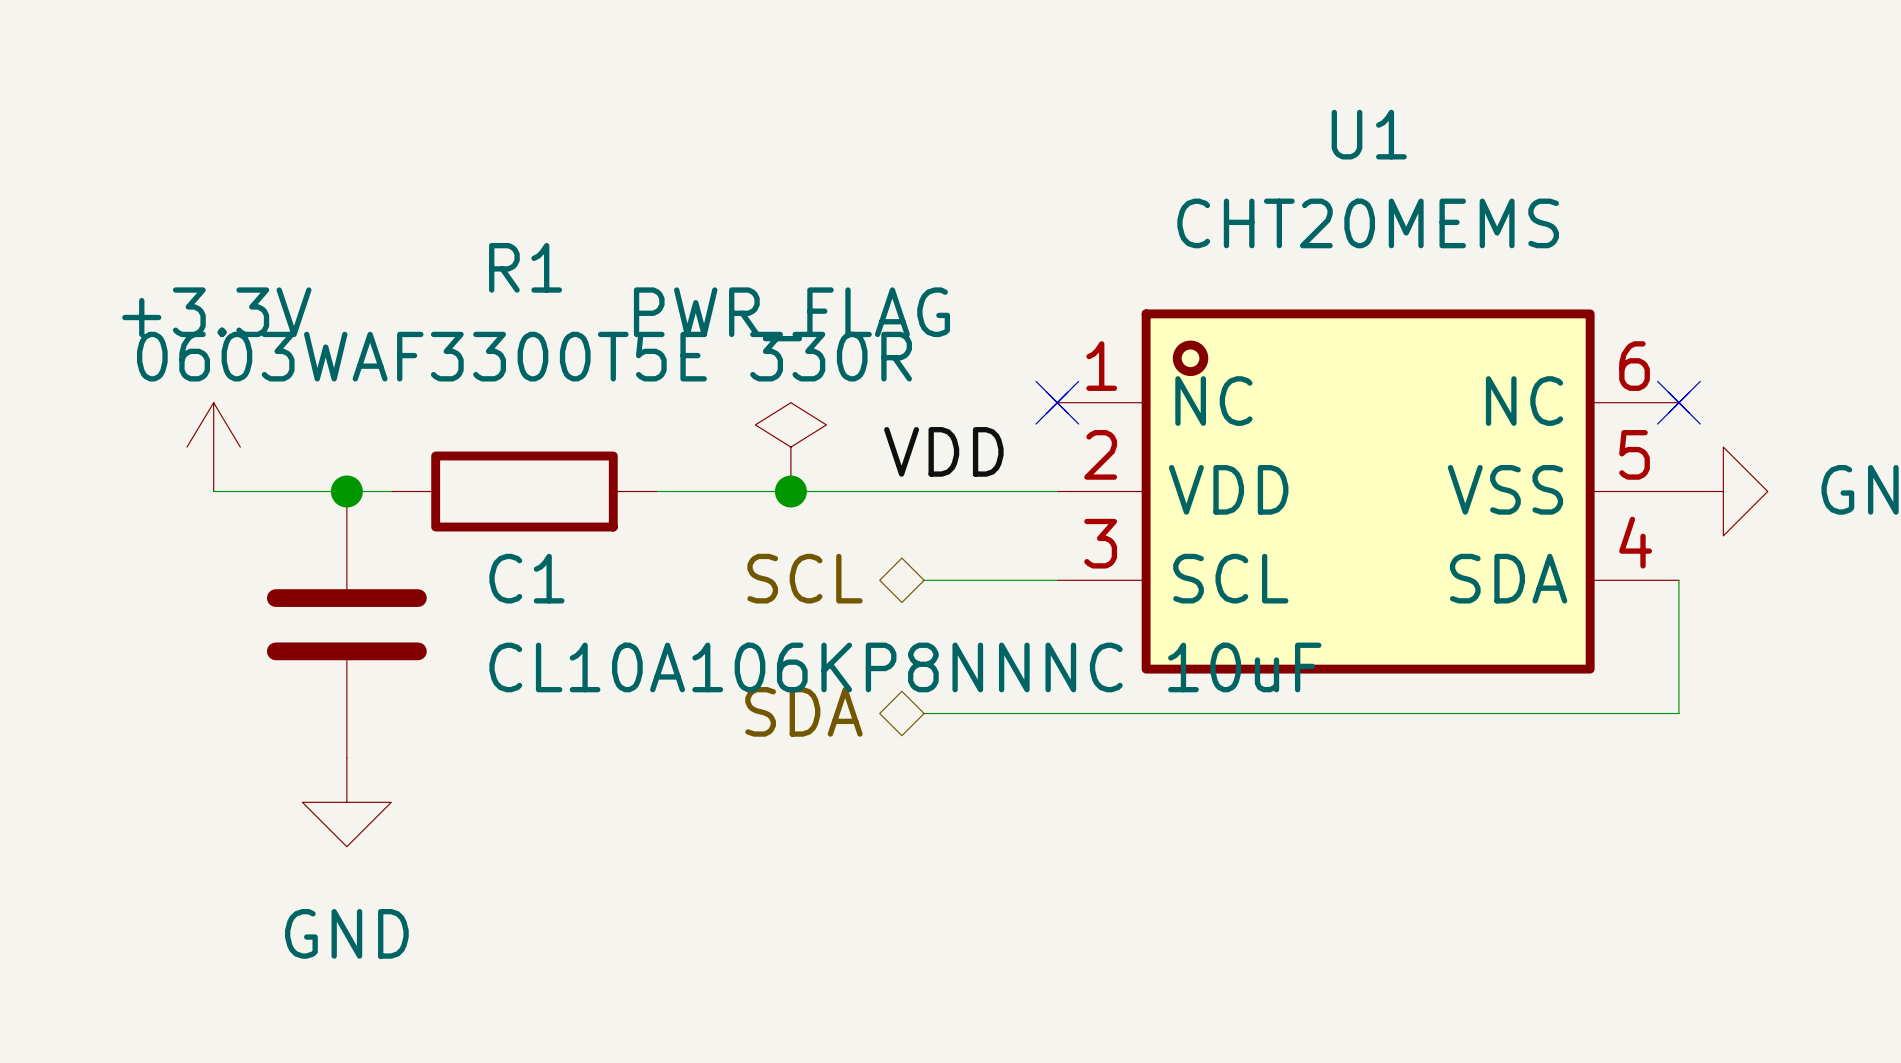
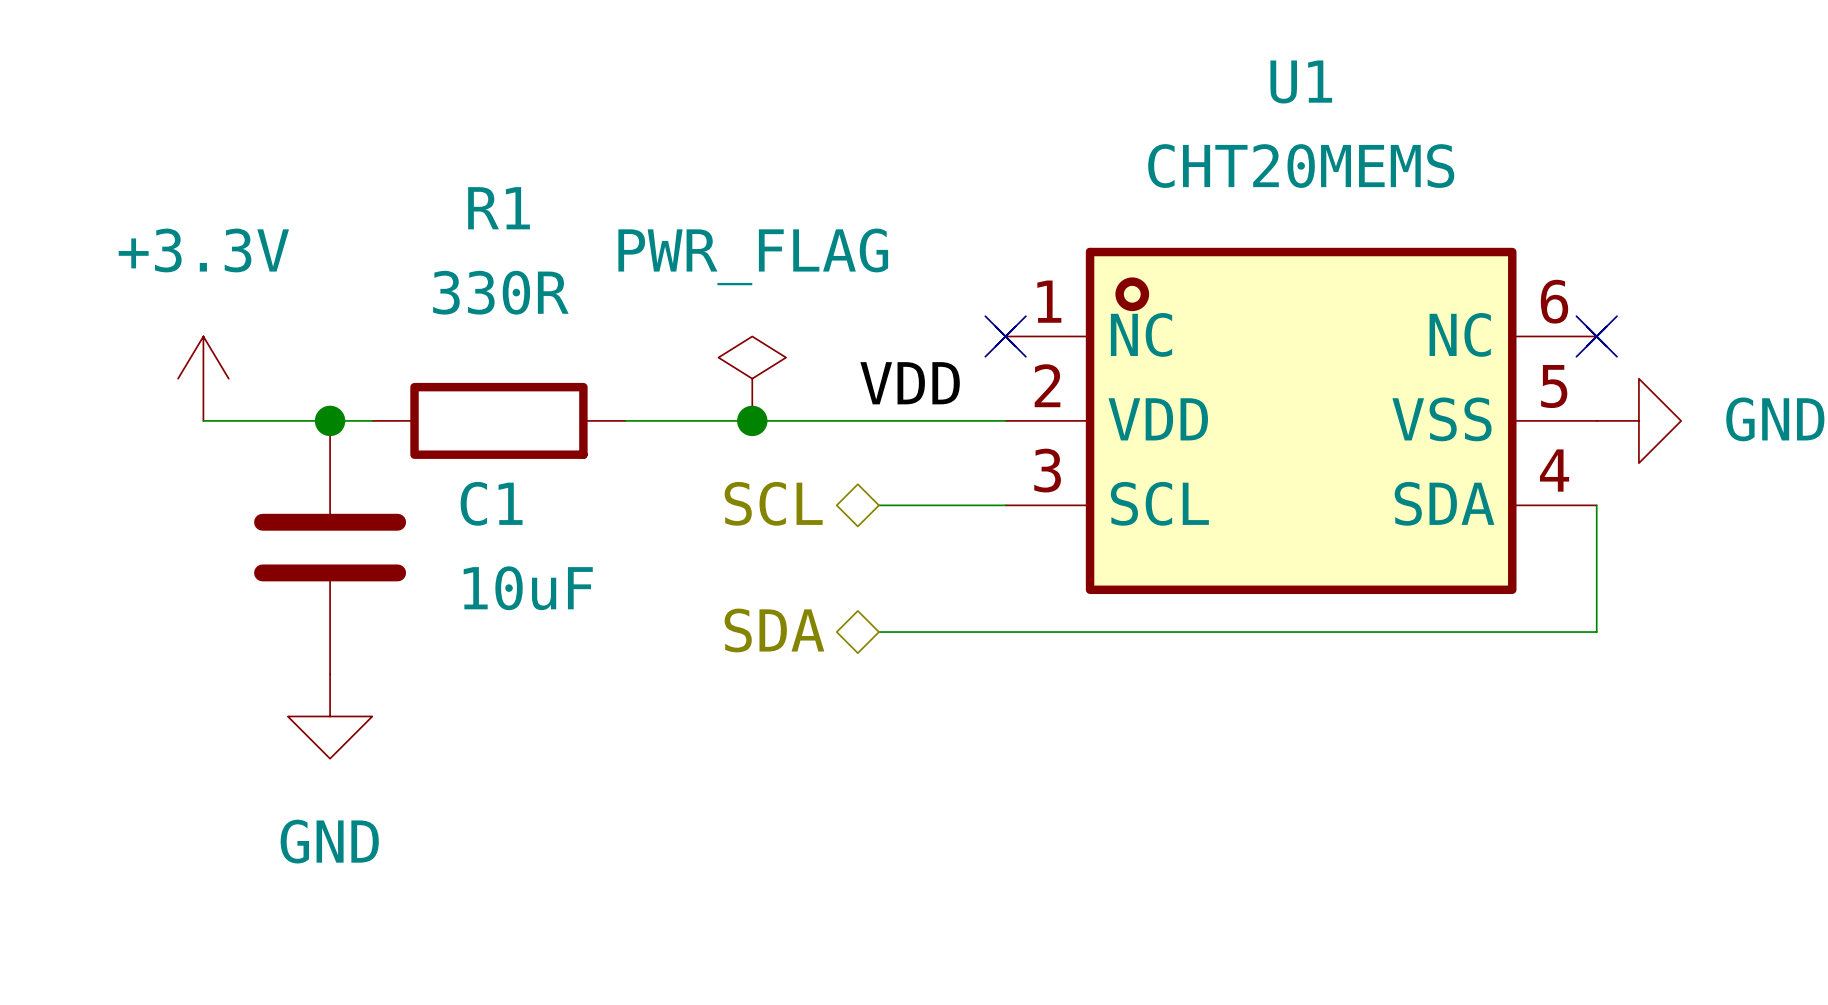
R1 value: 0603WAF3300T5E 330R (524, 356) -> 330R (500, 292)
C1 value: CL10A106KP8NNNC 10uF (905, 667) -> 10uF (528, 588)

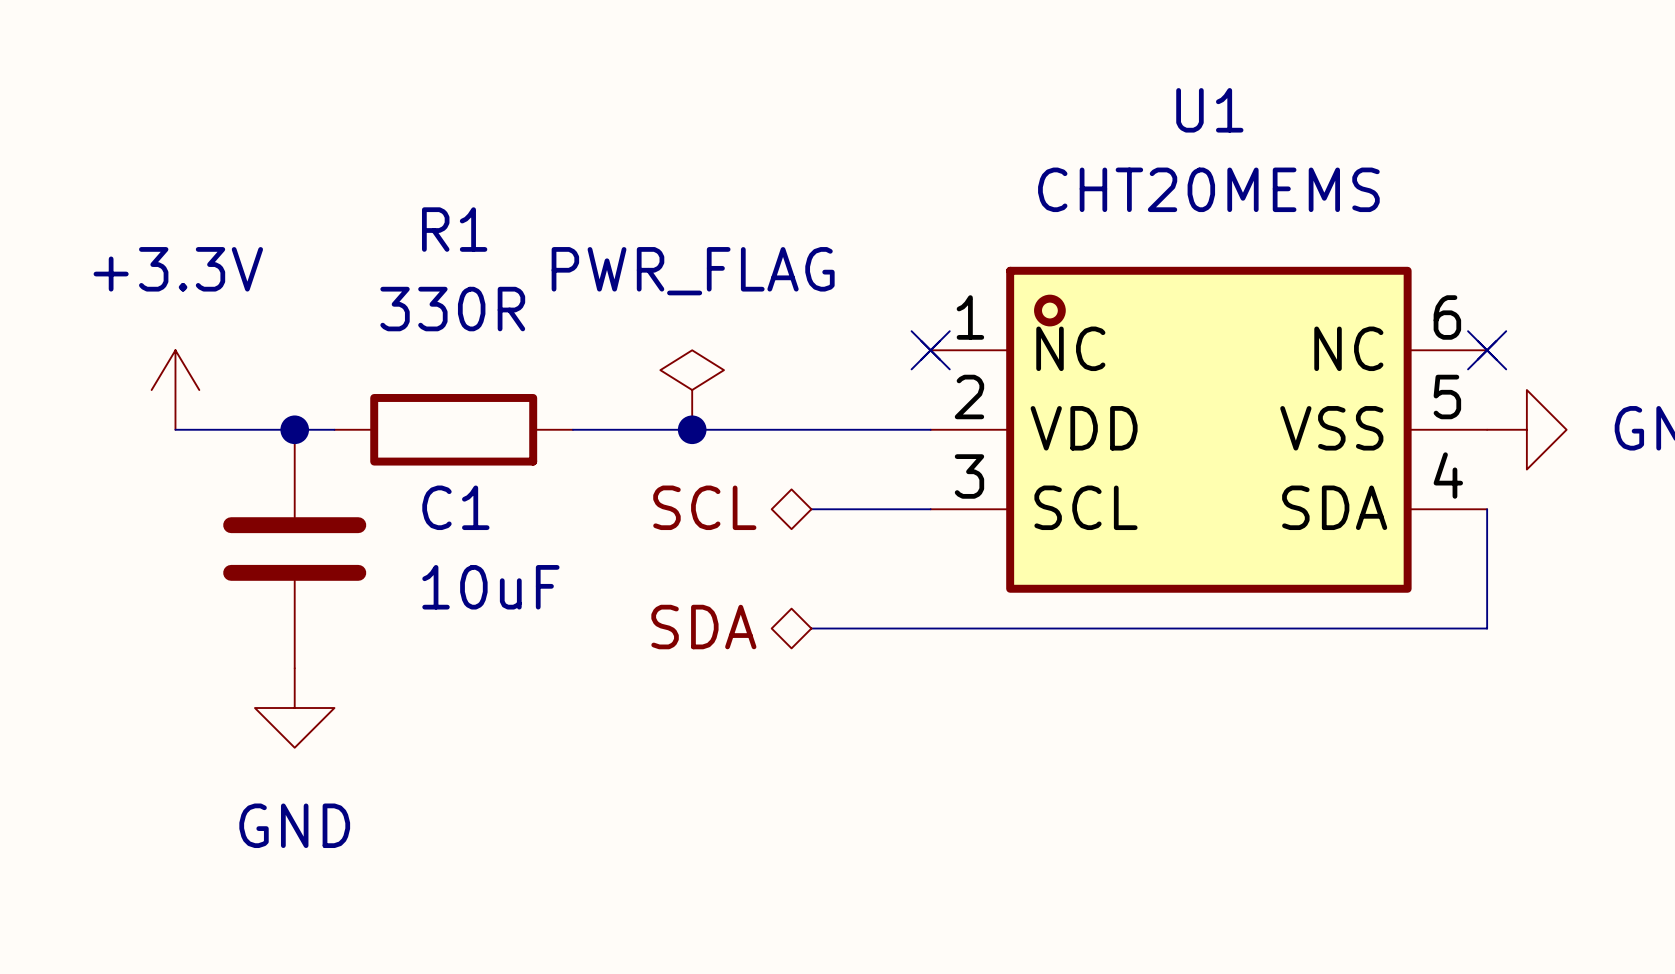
label: VDD (910, 383) -> none

